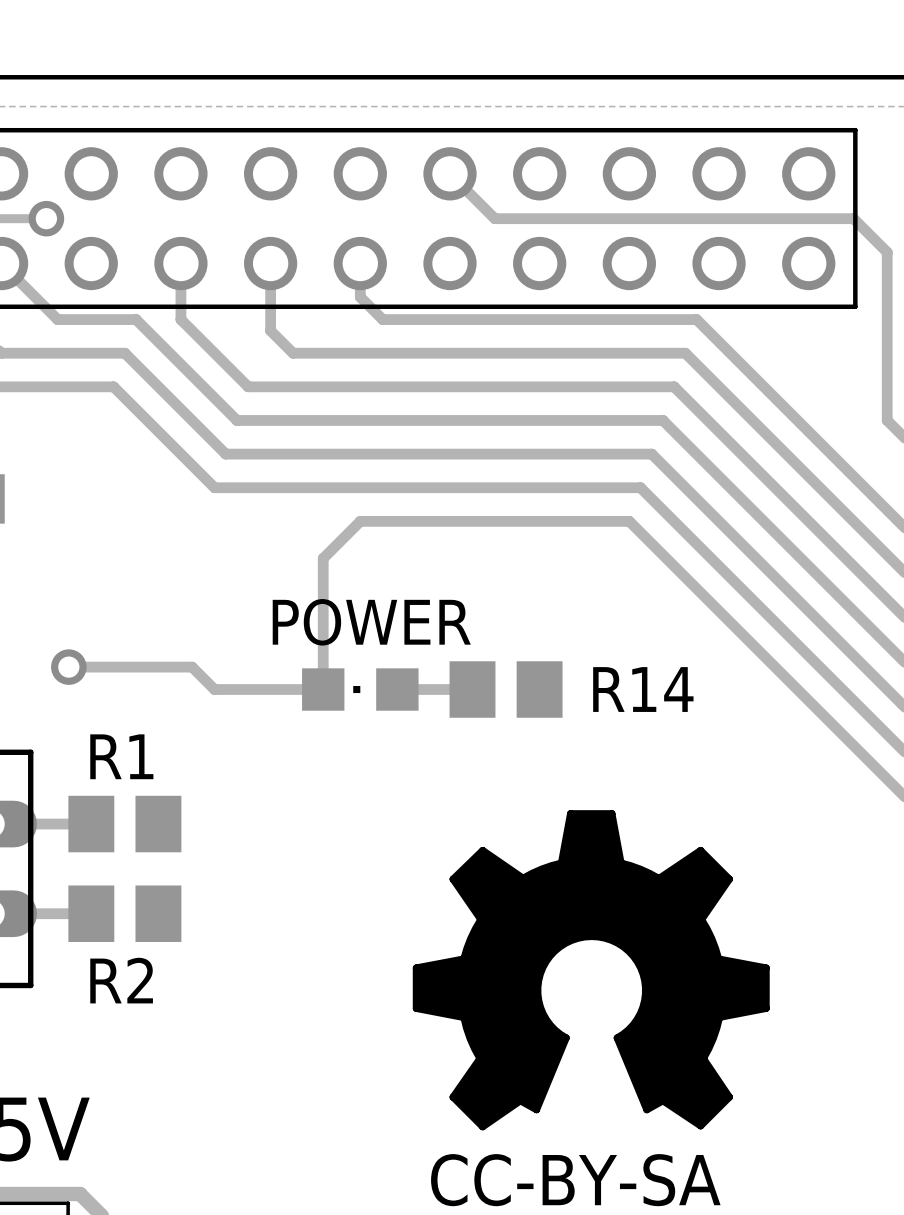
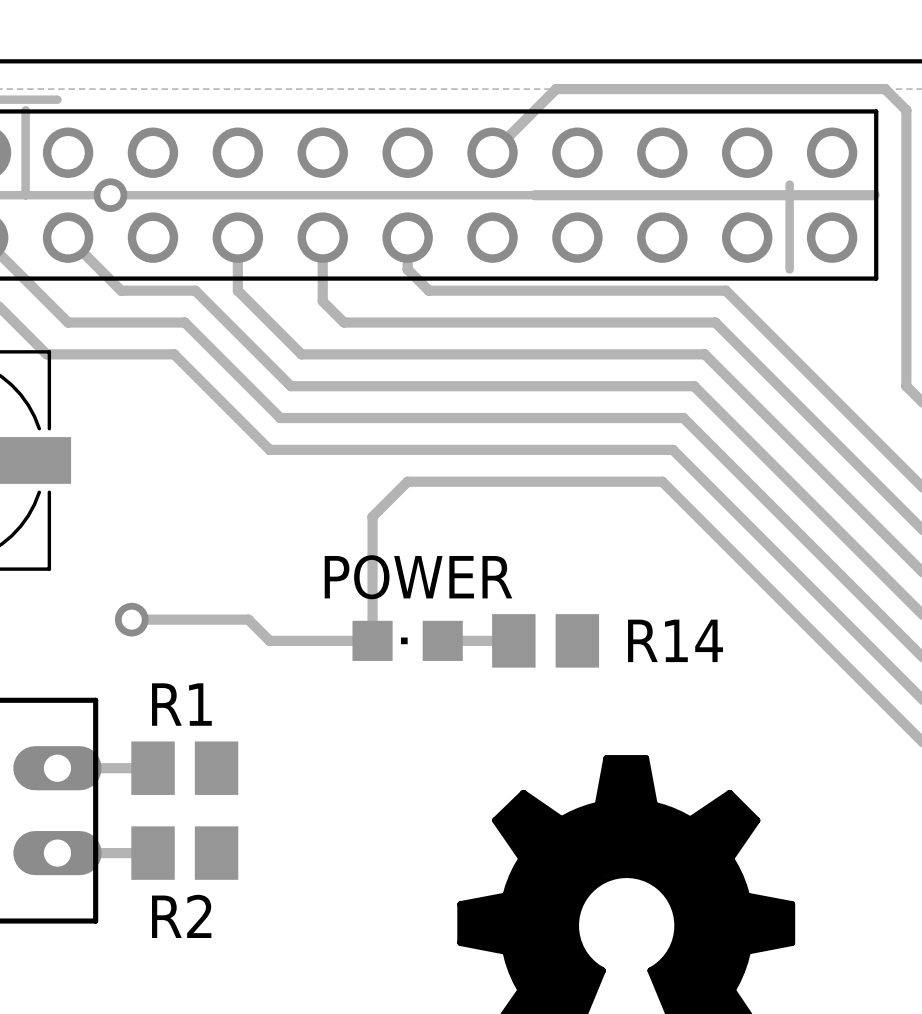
track: (449, 173) (494, 218) -> (492, 152) (556, 89) (885, 89) (906, 110) (906, 227)
track: none -> (789, 184) (789, 269)
track: none -> (110, 195) (534, 195)
track: (853, 218) (887, 252) -> none

